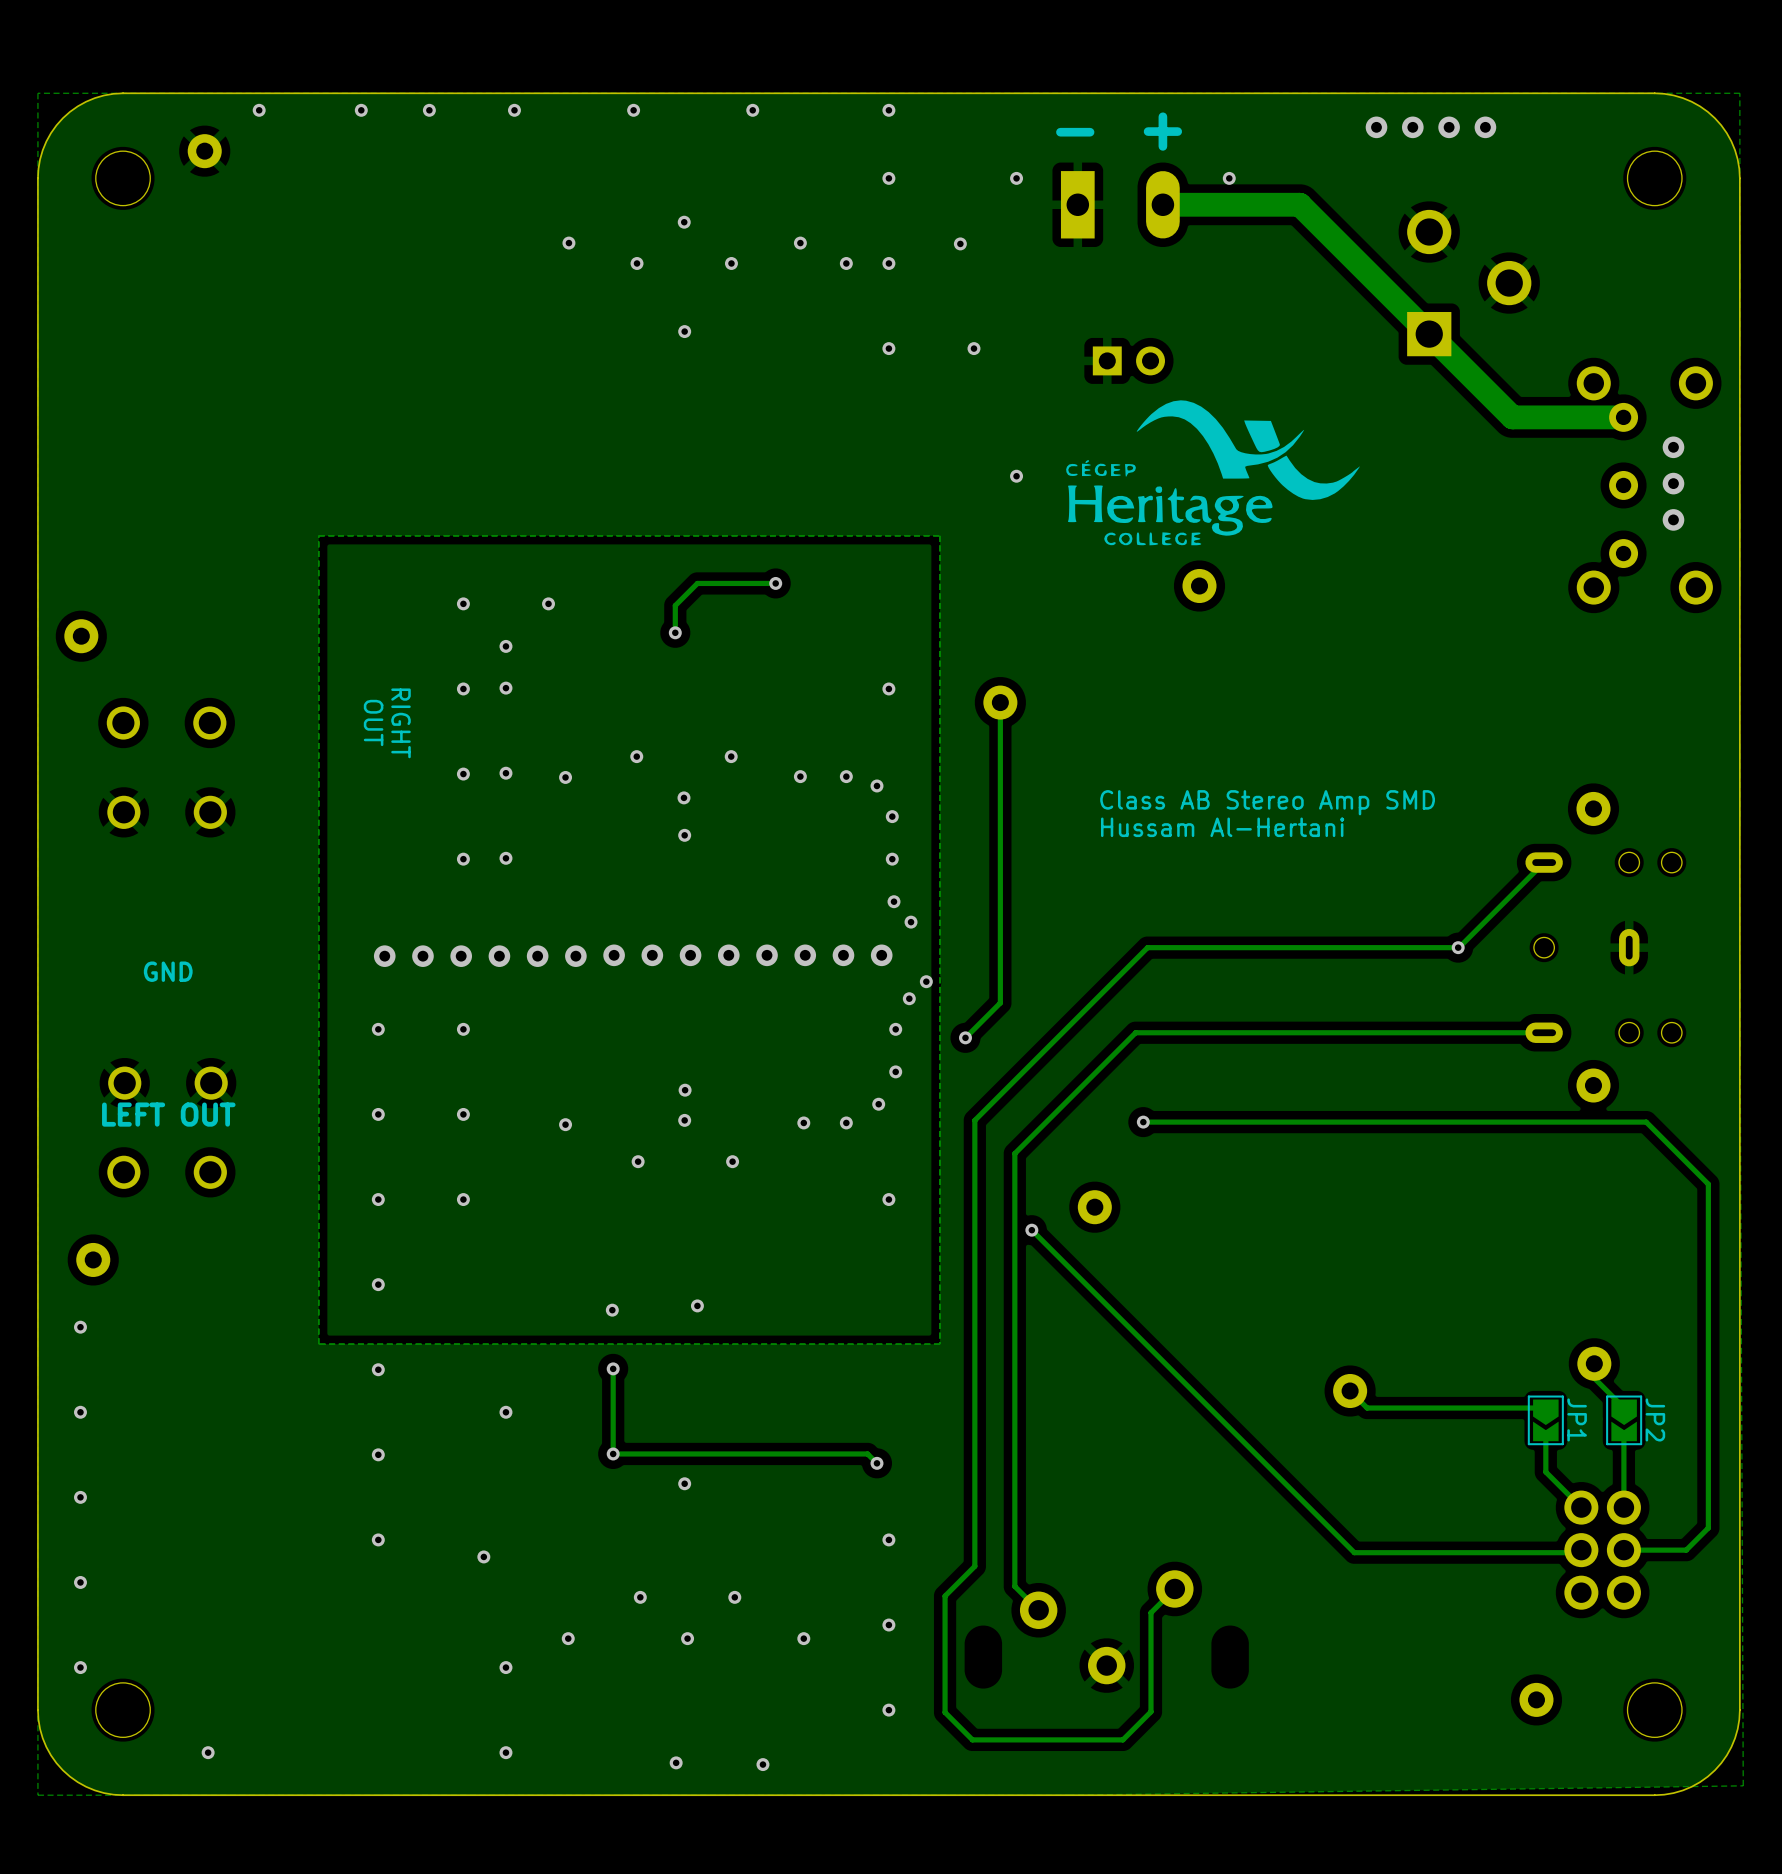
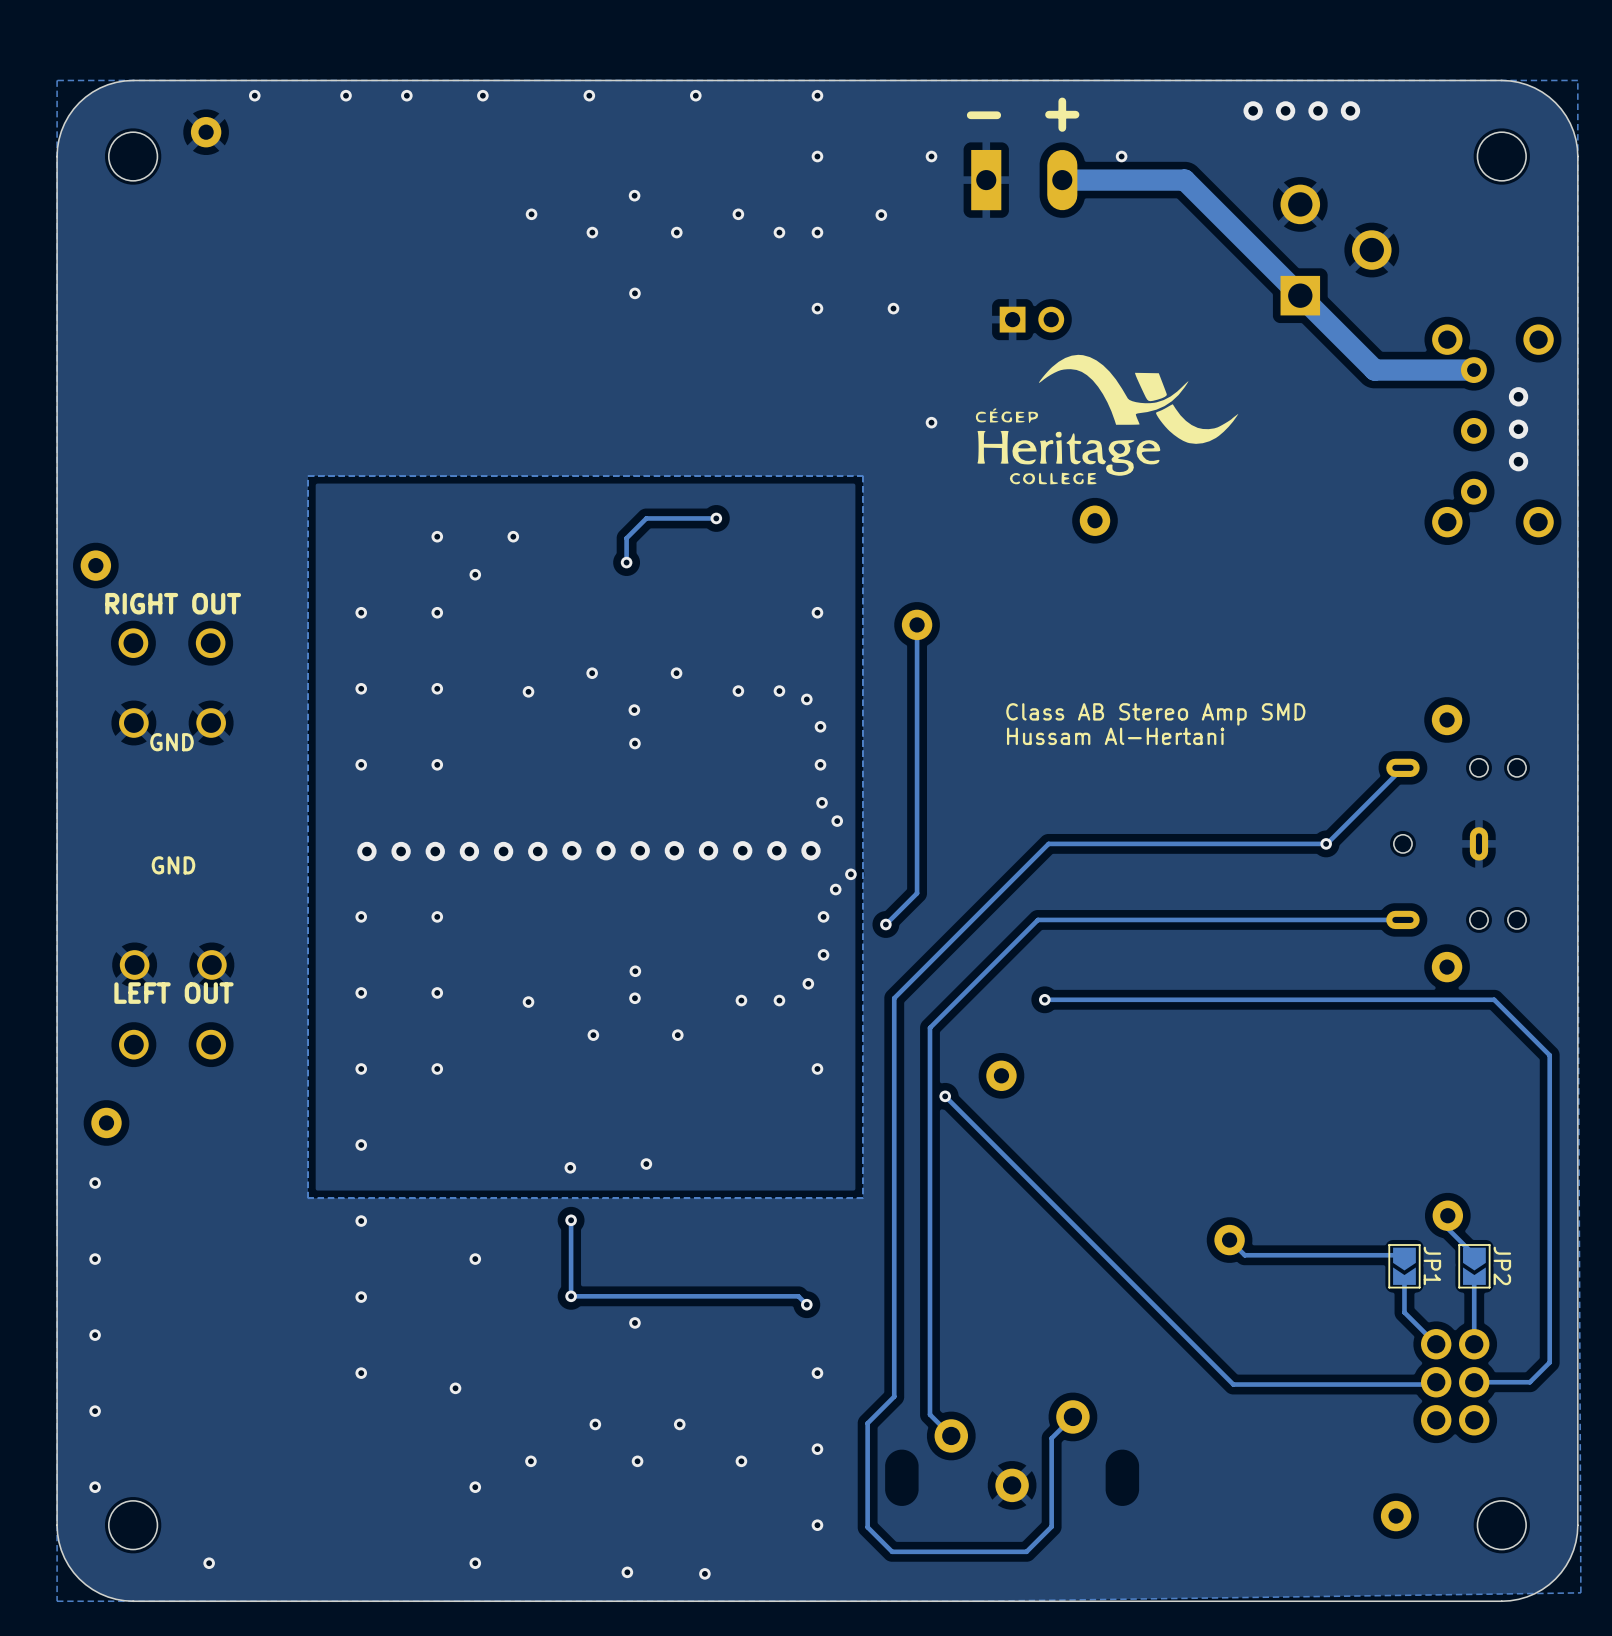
text: none -> RIGHT OUT (173, 603)
via: none -> (361, 612)
via: (505, 688) -> none
text: OUT (373, 722) -> none
text: RIGHT (401, 723) -> none
via: (505, 773) -> none
via: none -> (361, 688)
text: none -> GND (171, 742)
via: (505, 858) -> none
via: none -> (361, 764)

